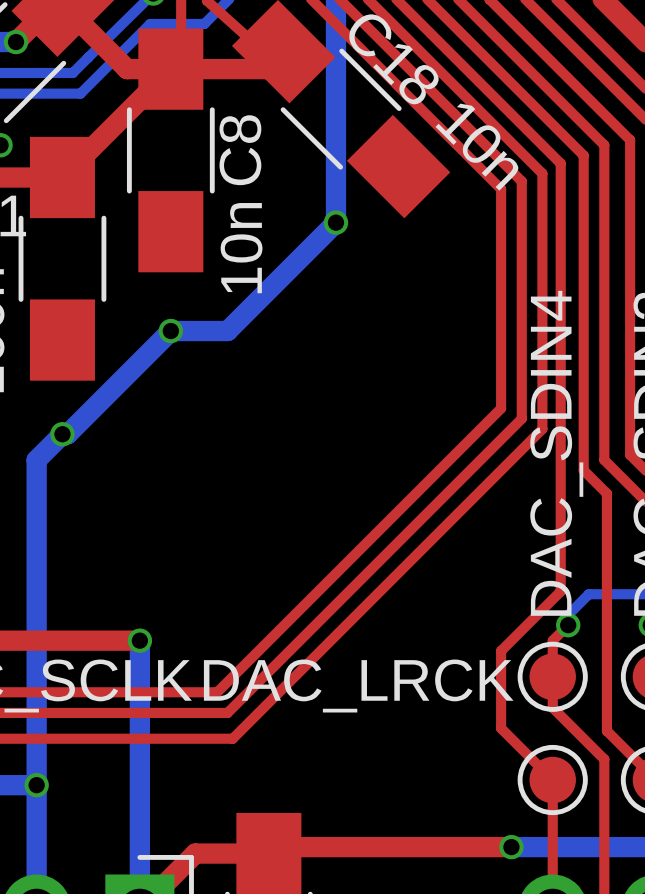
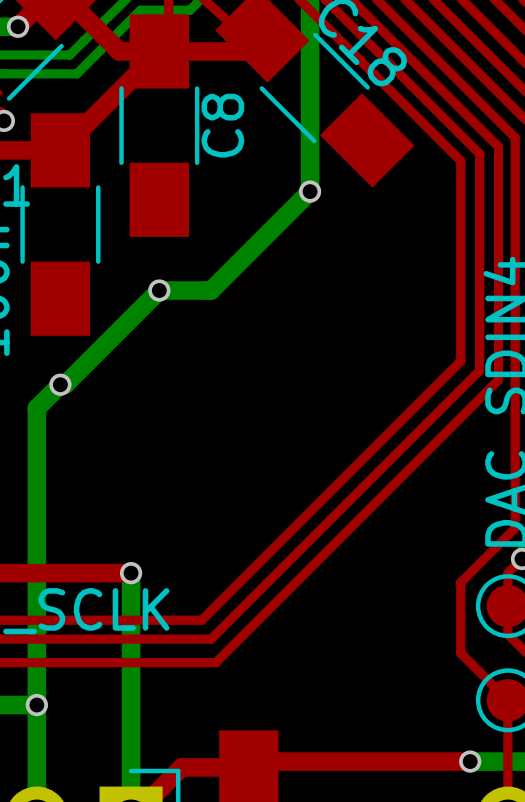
C18 value: 10n (476, 147) -> none
C8 value: 10n (241, 248) -> none
part value: DAC_LRCK (358, 686) -> none

